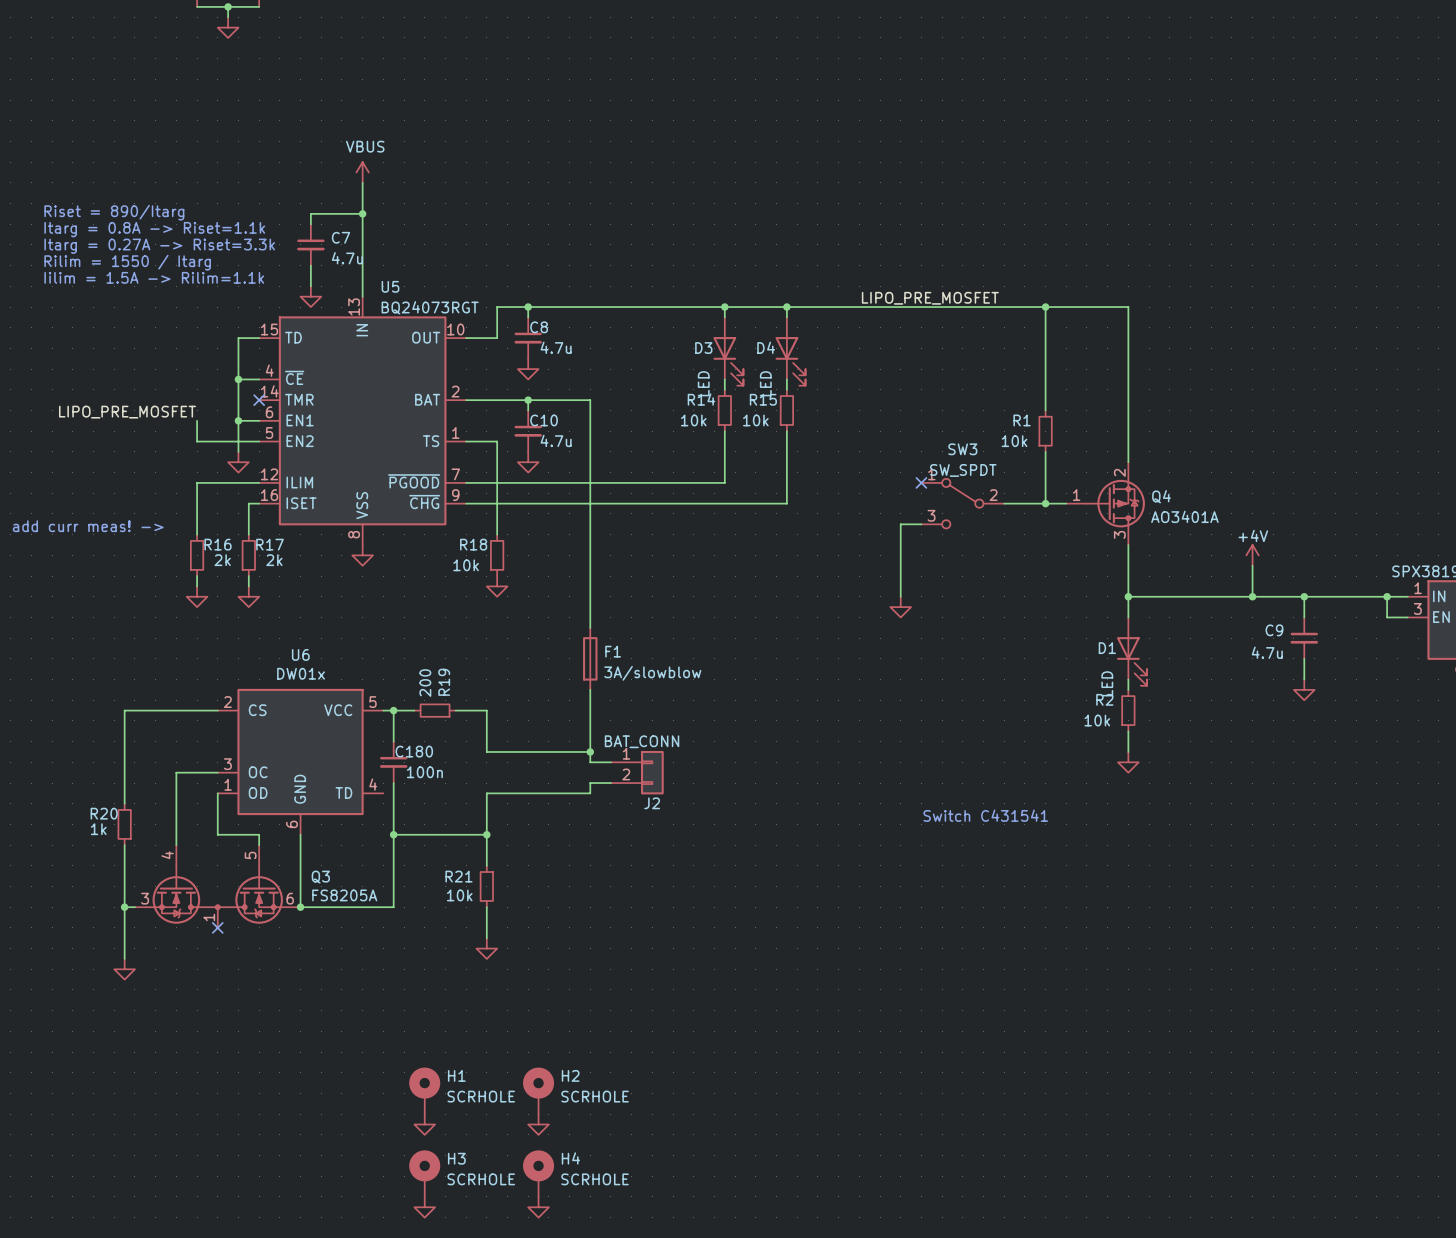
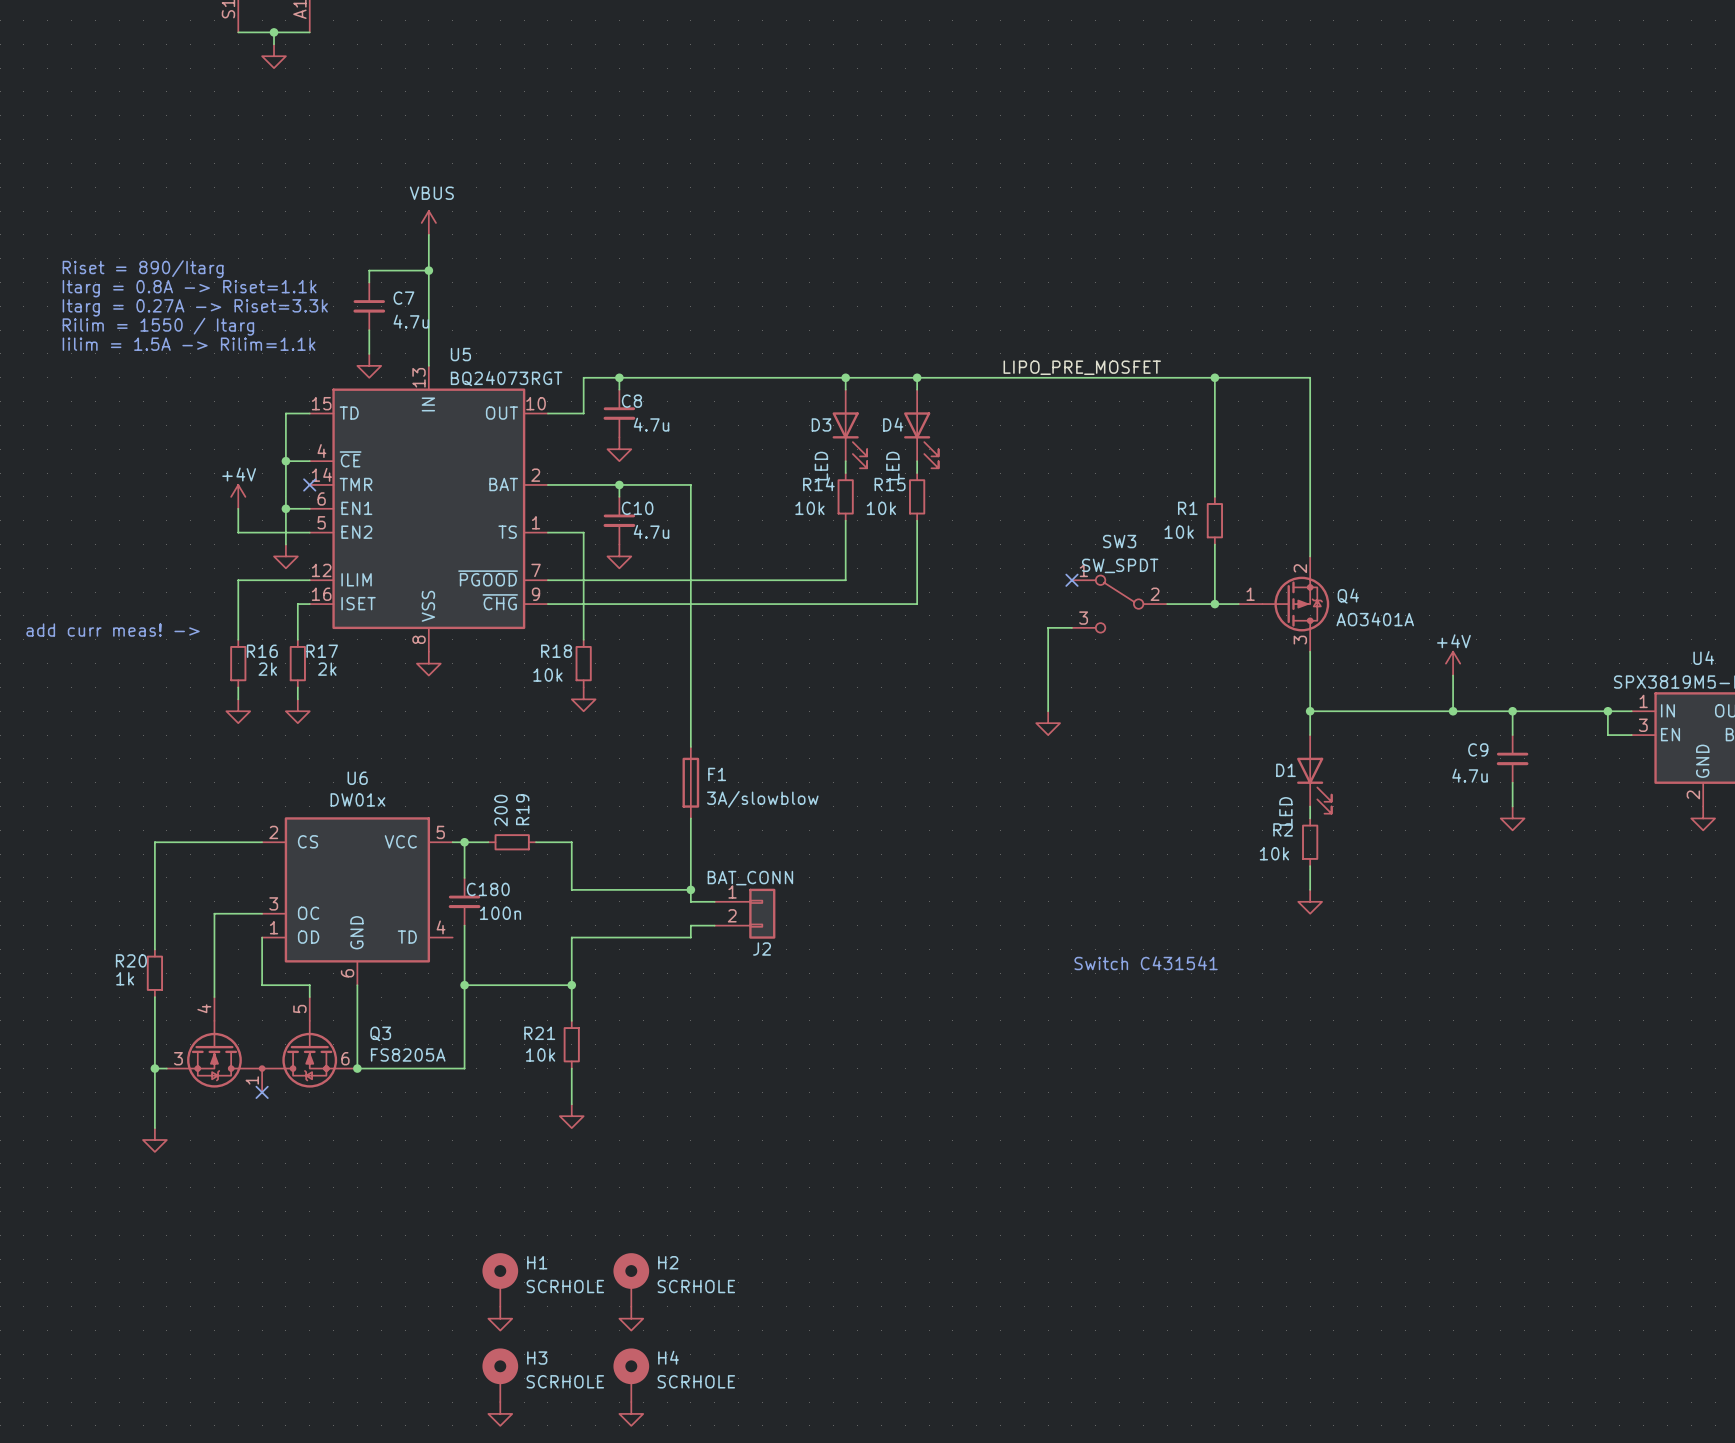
power symbol: none -> +4V (238, 496)
label: LIPO_PRE_MOSFET (127, 412) -> none

